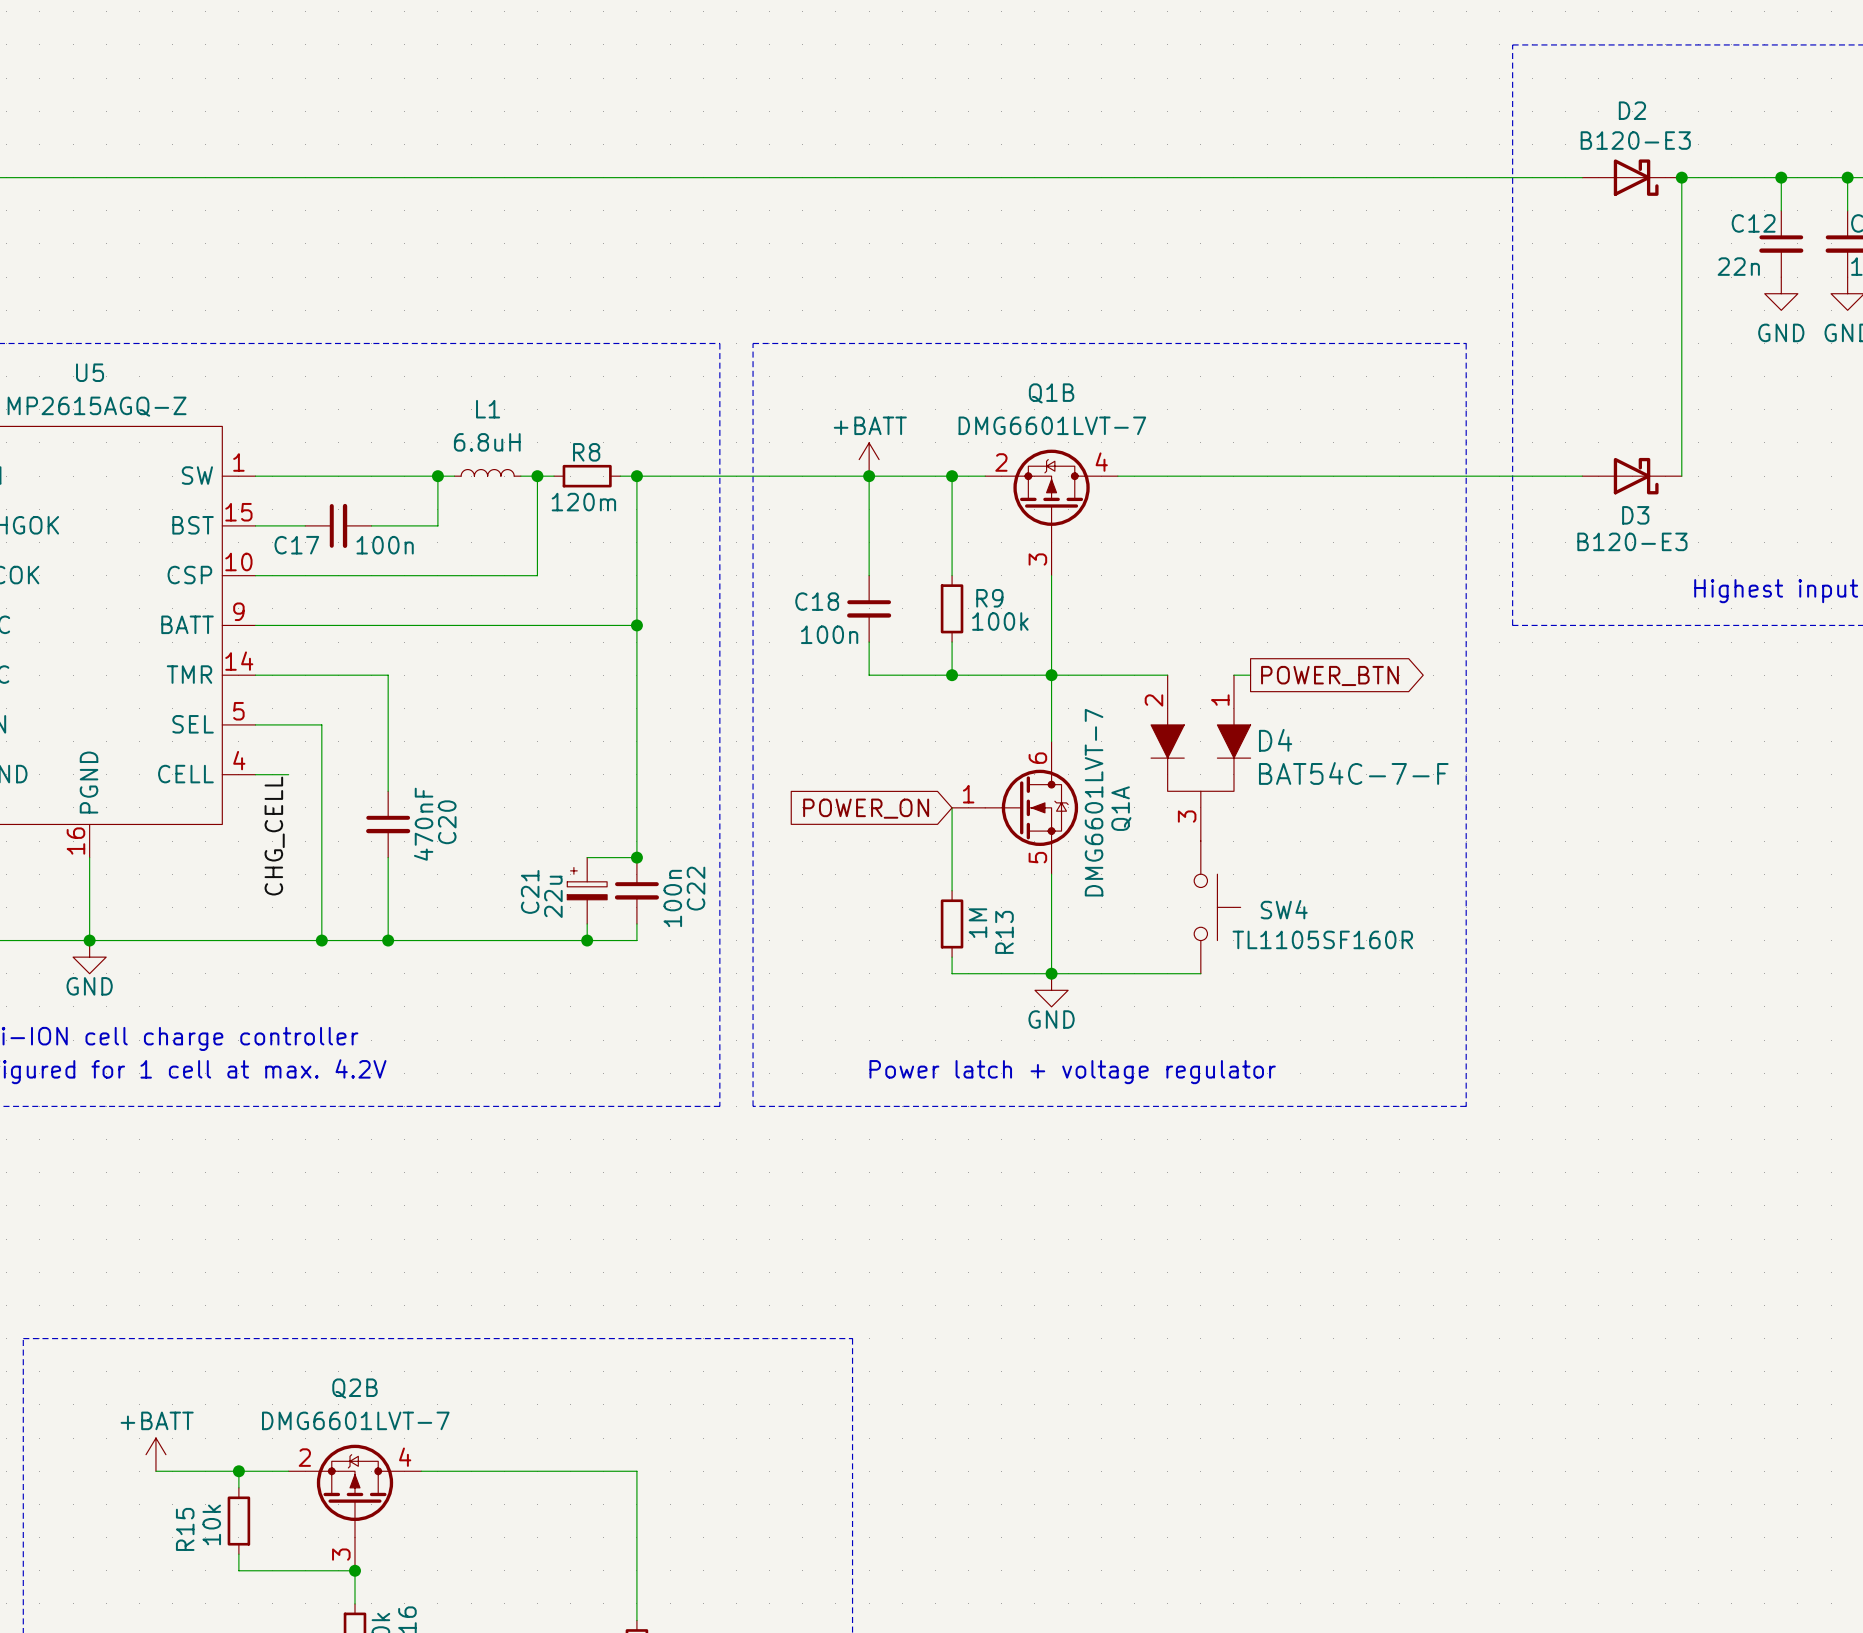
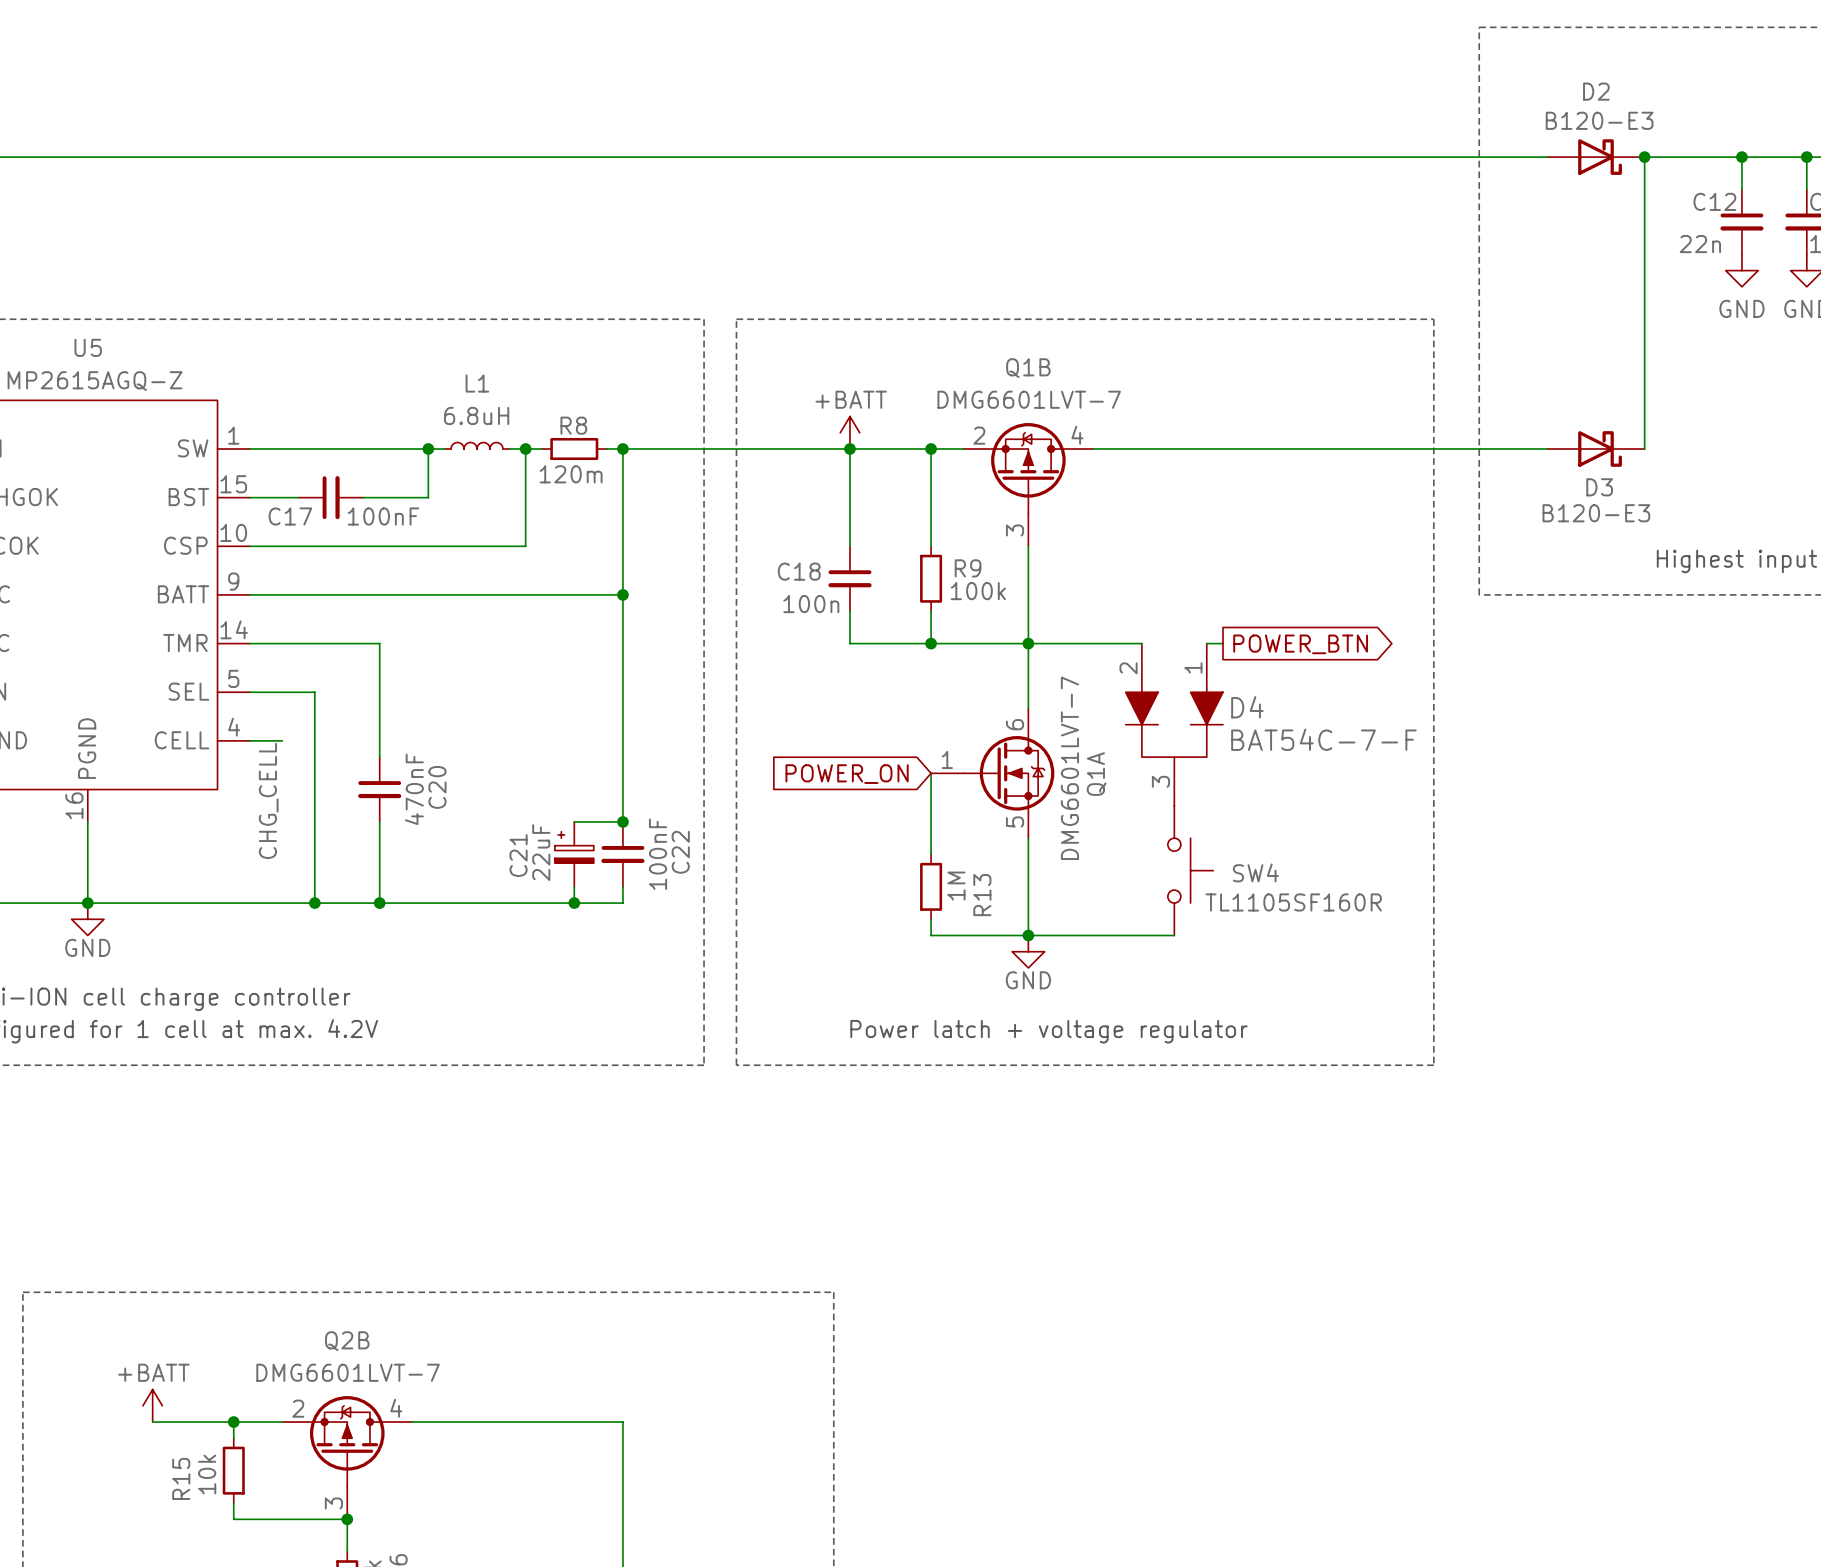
C17 value: 100n (385, 545) -> 100nF (383, 516)
C21 value: 22u (553, 896) -> 22uF (541, 852)
C22 value: 100n (672, 898) -> 100nF (658, 854)

